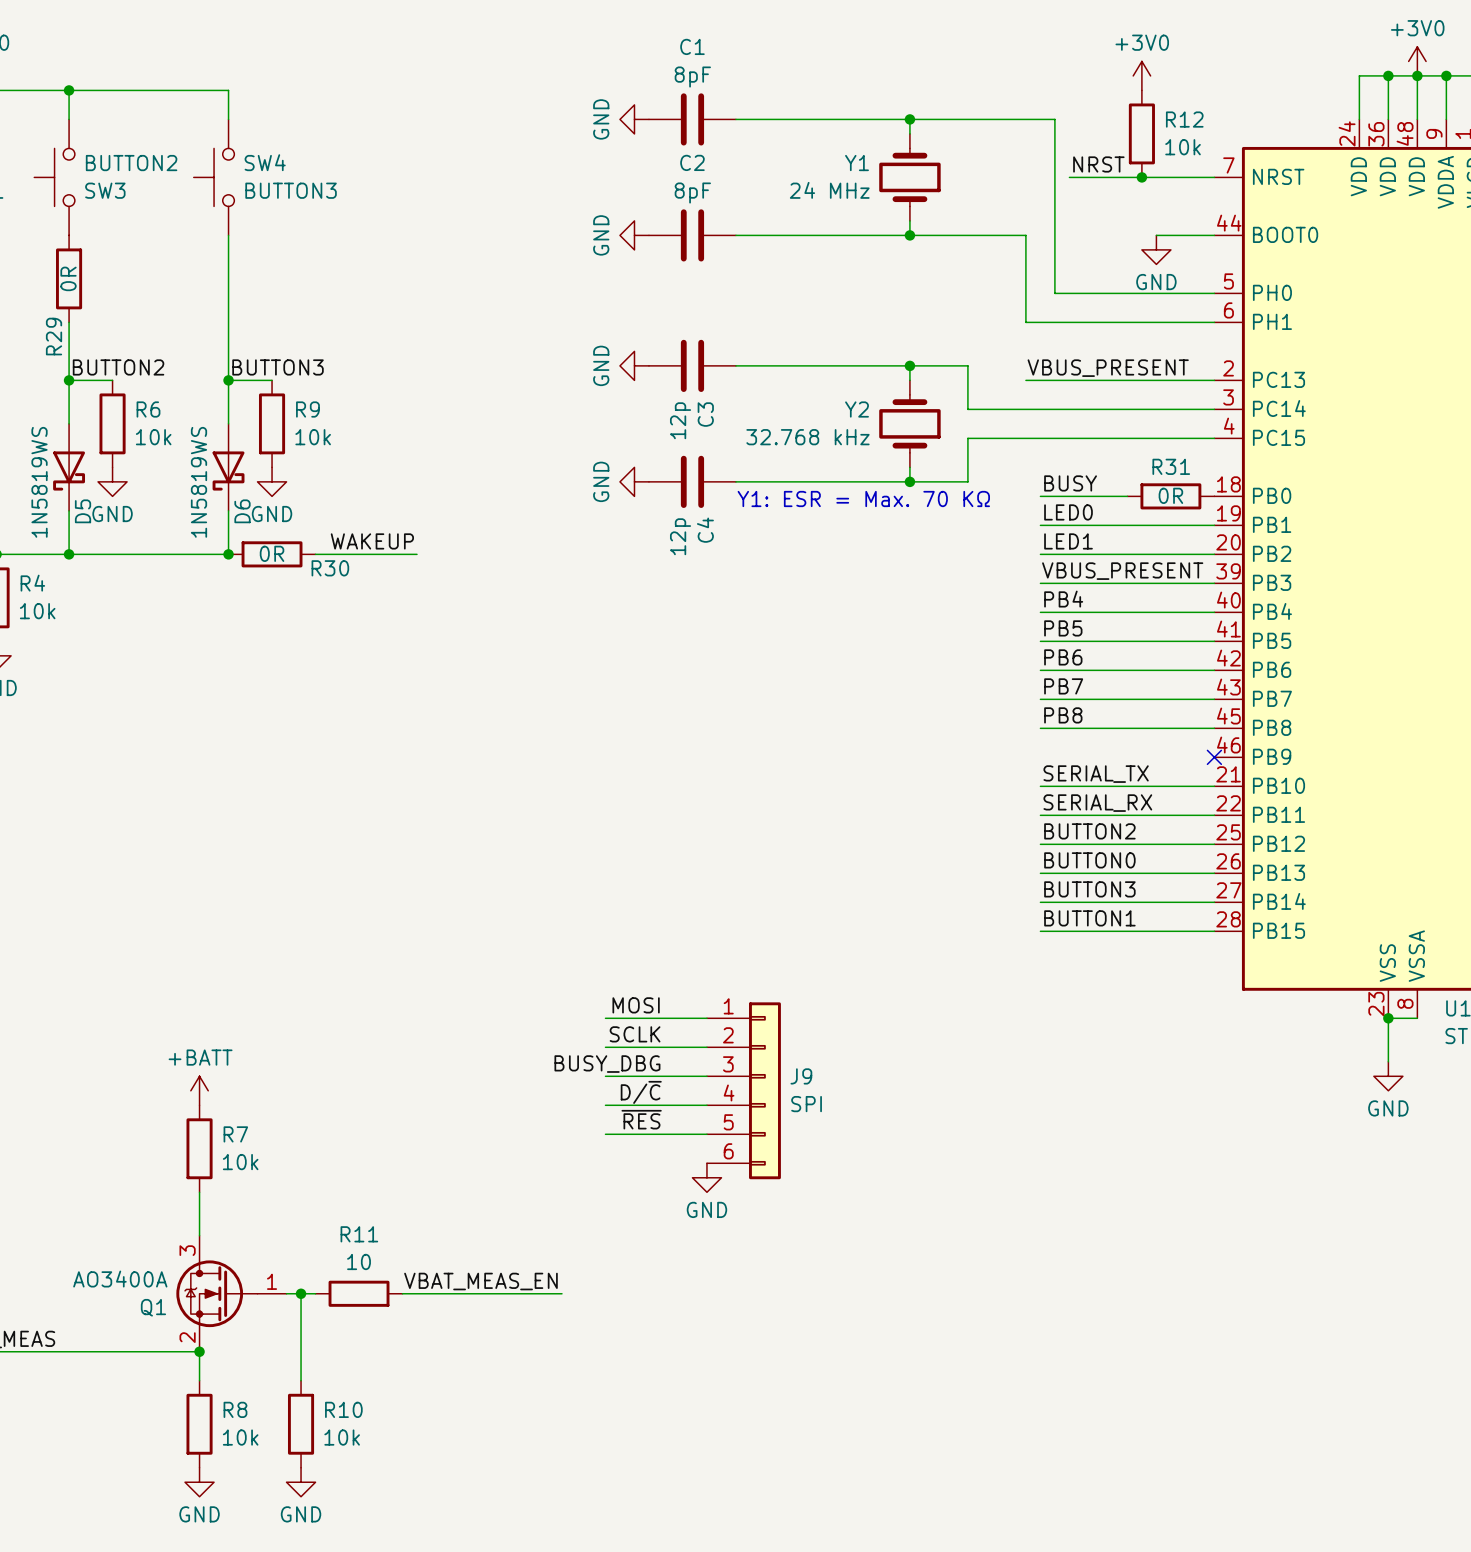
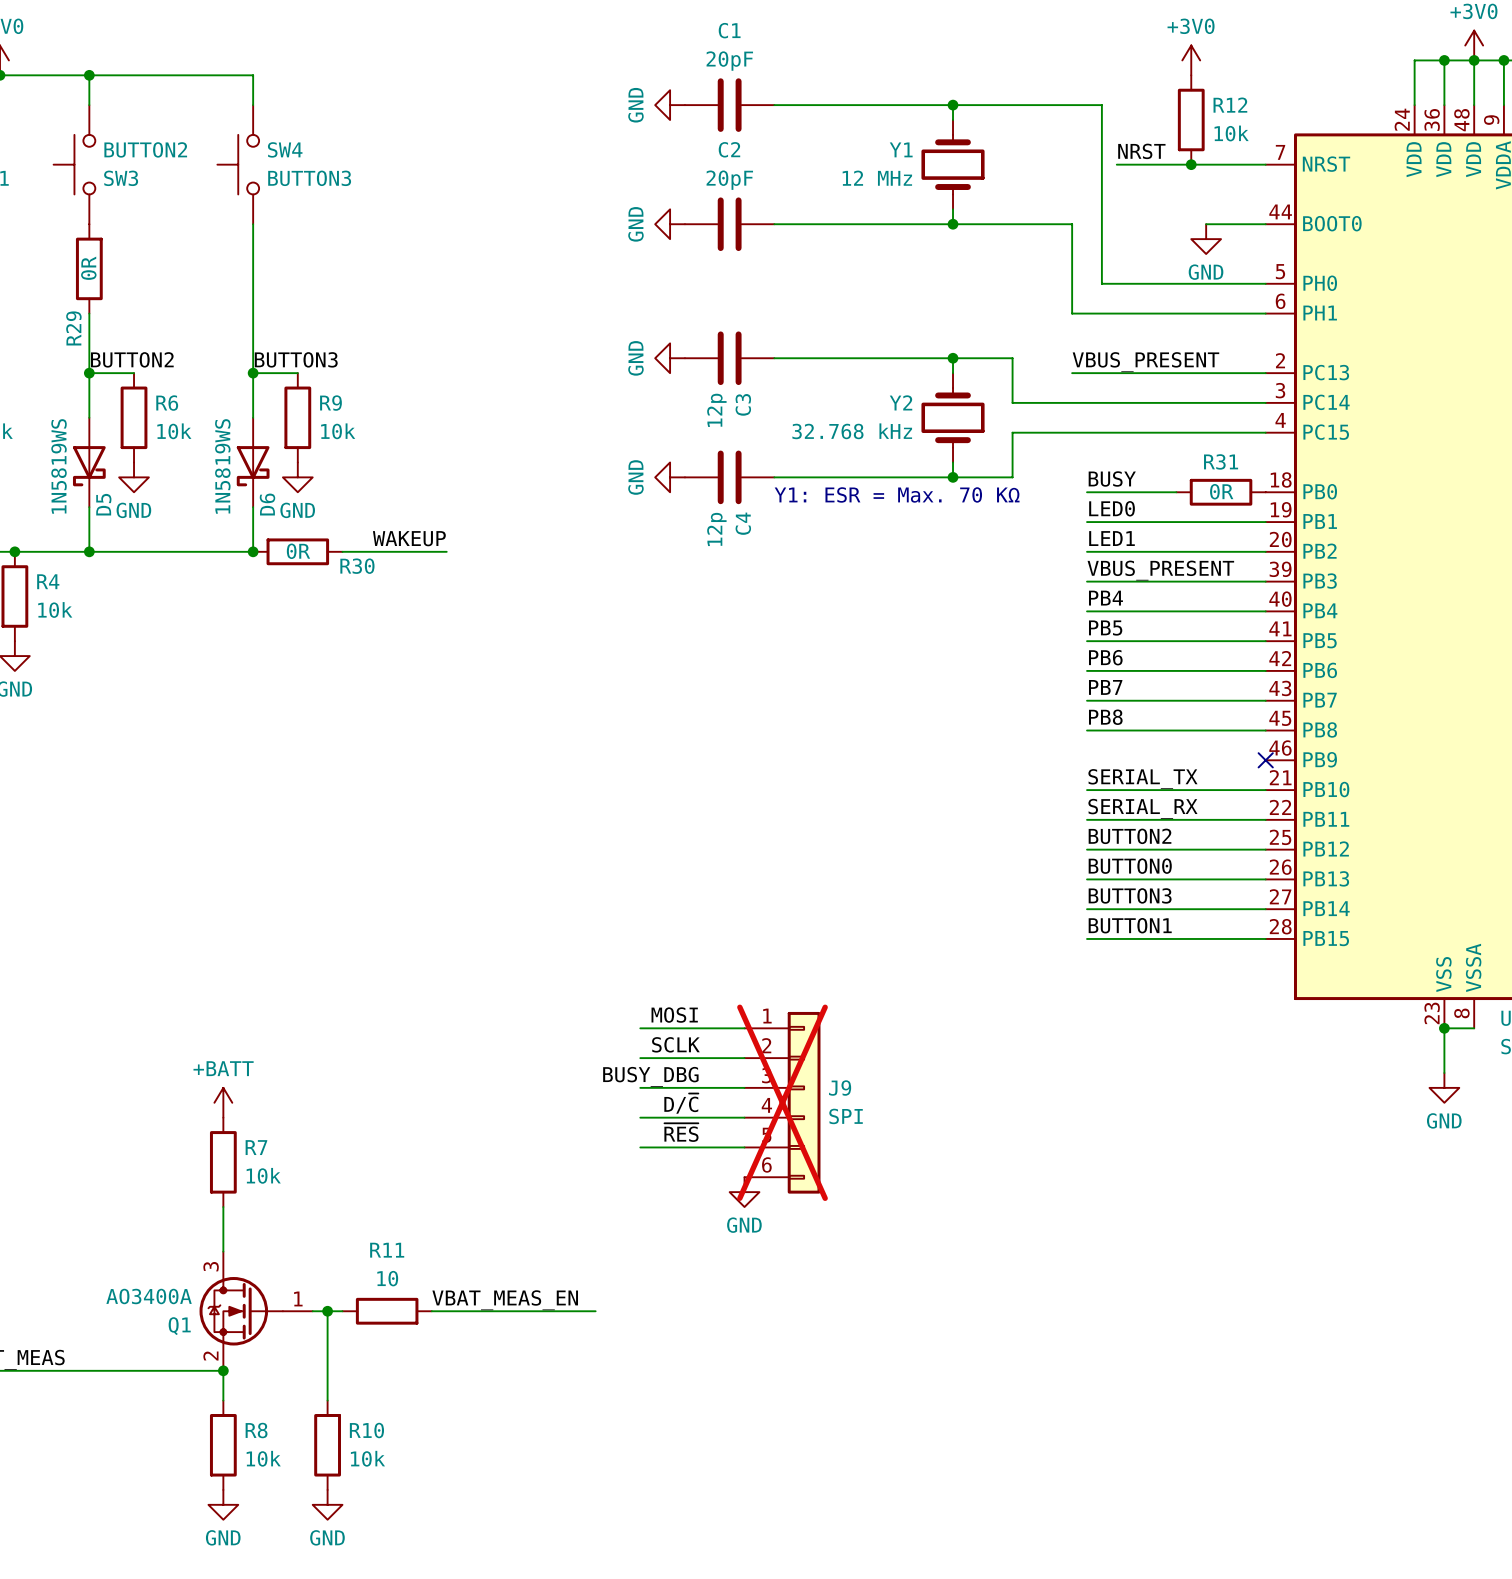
C1 value: 8pF (692, 77) -> 20pF (729, 61)
Y1 value: 24 MHz (829, 190) -> 12 MHz (877, 178)
C2 value: 8pF (692, 193) -> 20pF (729, 180)
J9 do-not-place cross: none -> (782, 1102)

